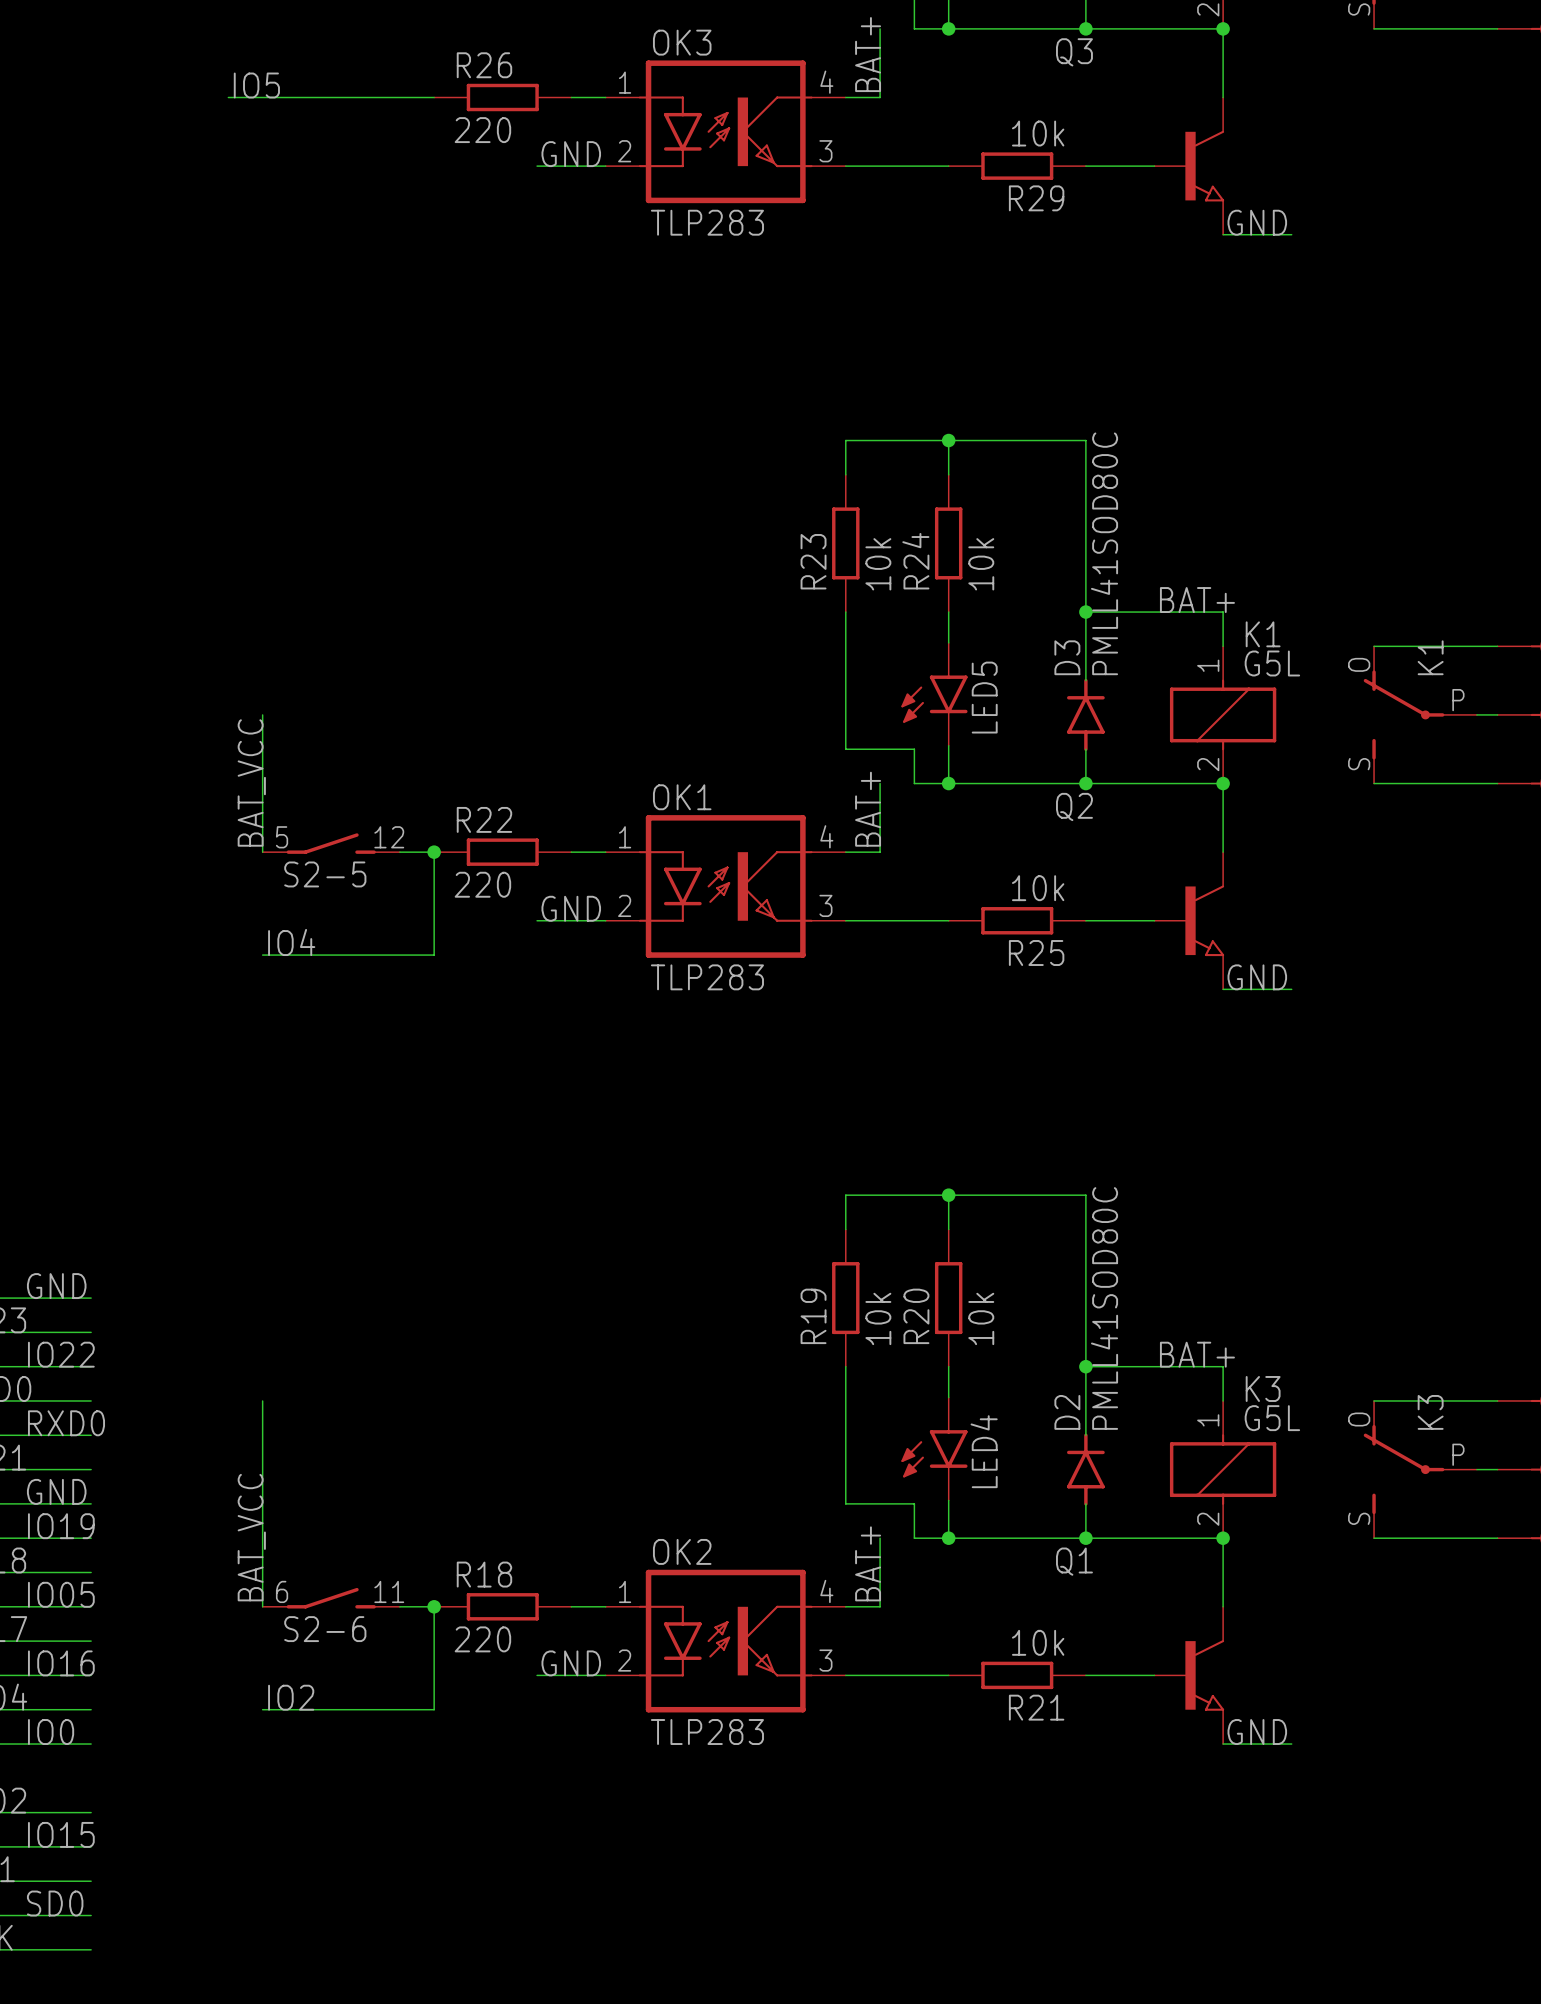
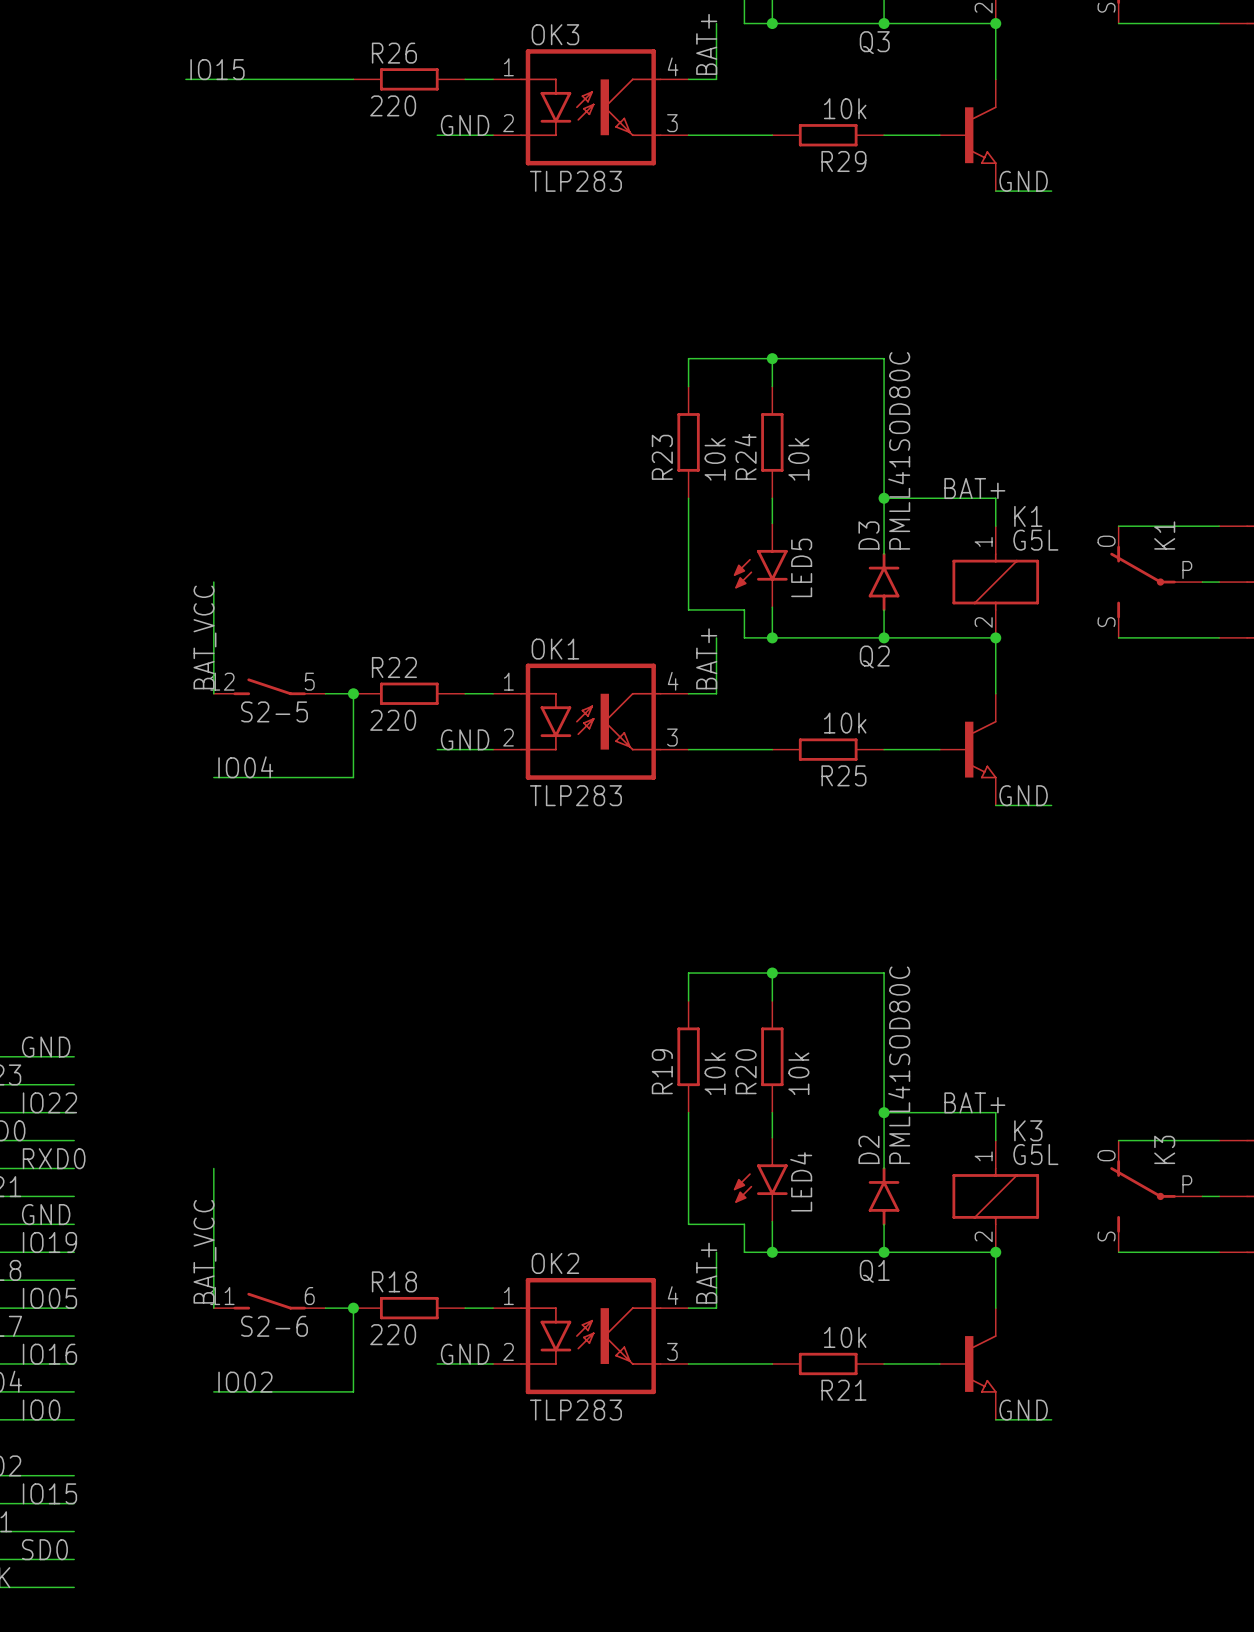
label: IO5 (256, 85) -> IO15 (217, 69)
S2-5 flip: as is (331, 843) -> left-right (269, 686)
label: IO4 (291, 942) -> IO04 (245, 767)
wire: (262, 1400) (262, 1435) -> none
S2-6 flip: as is (331, 1598) -> left-right (269, 1301)
label: IO2 (291, 1697) -> IO02 (245, 1382)

